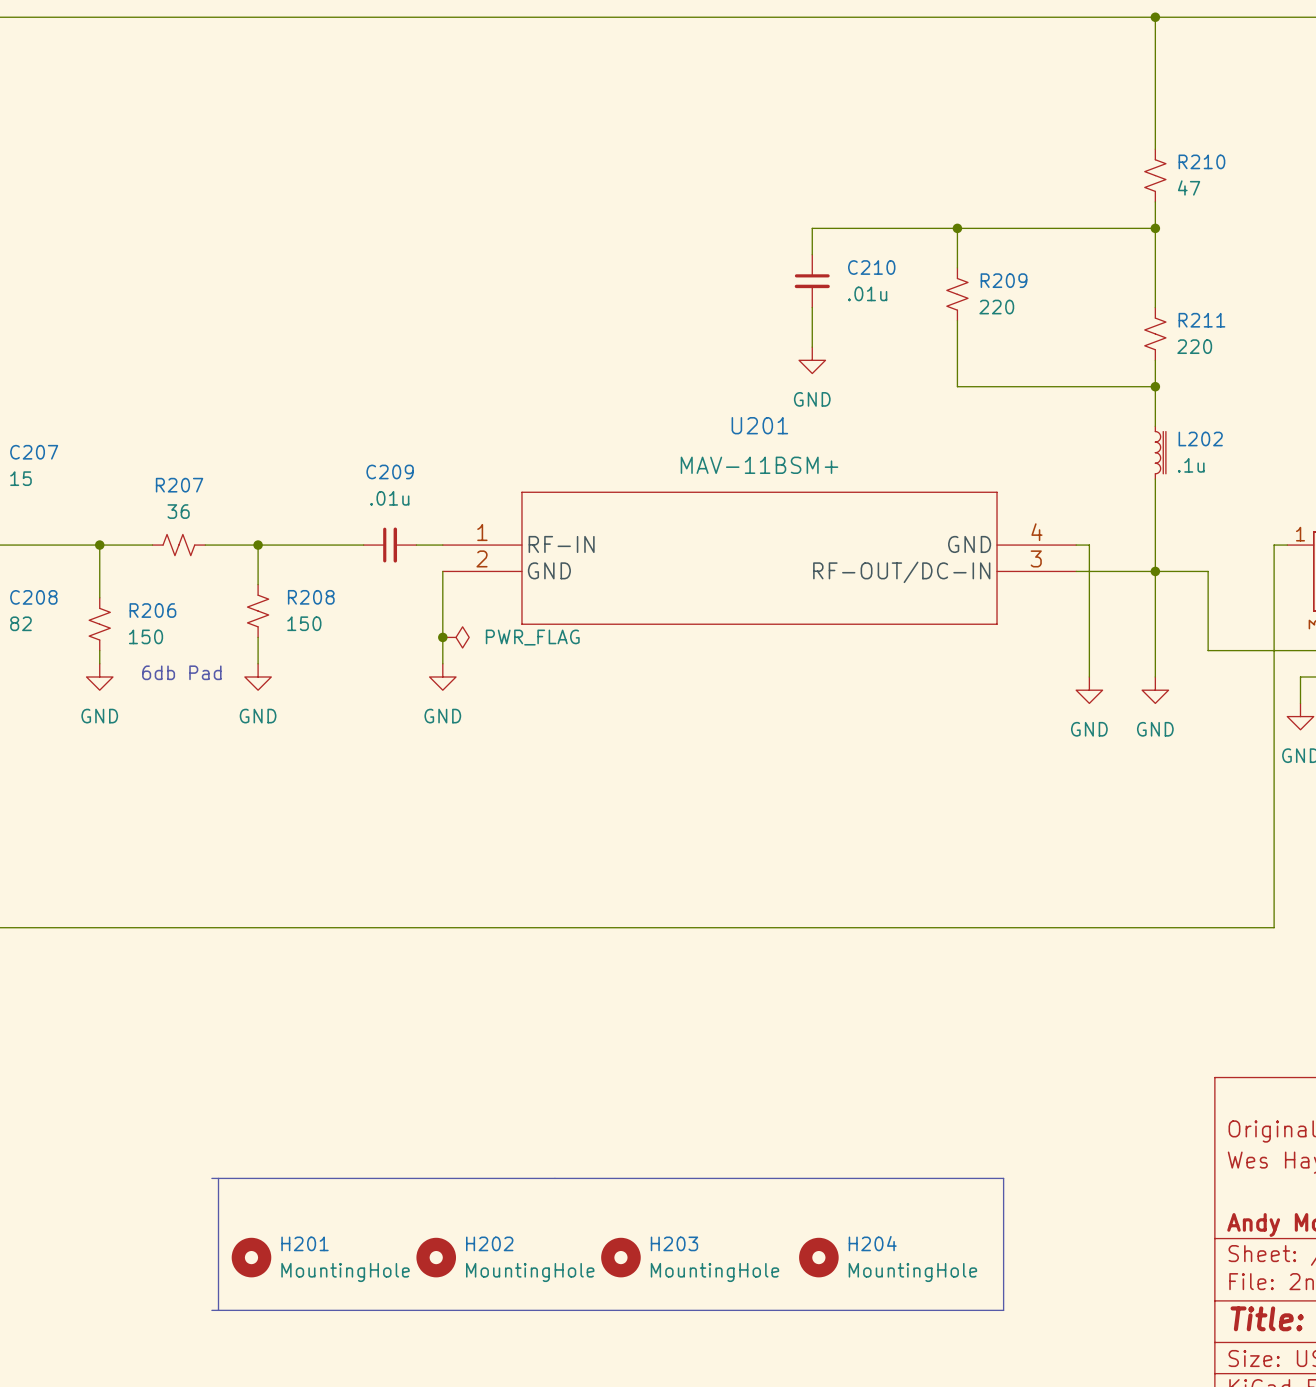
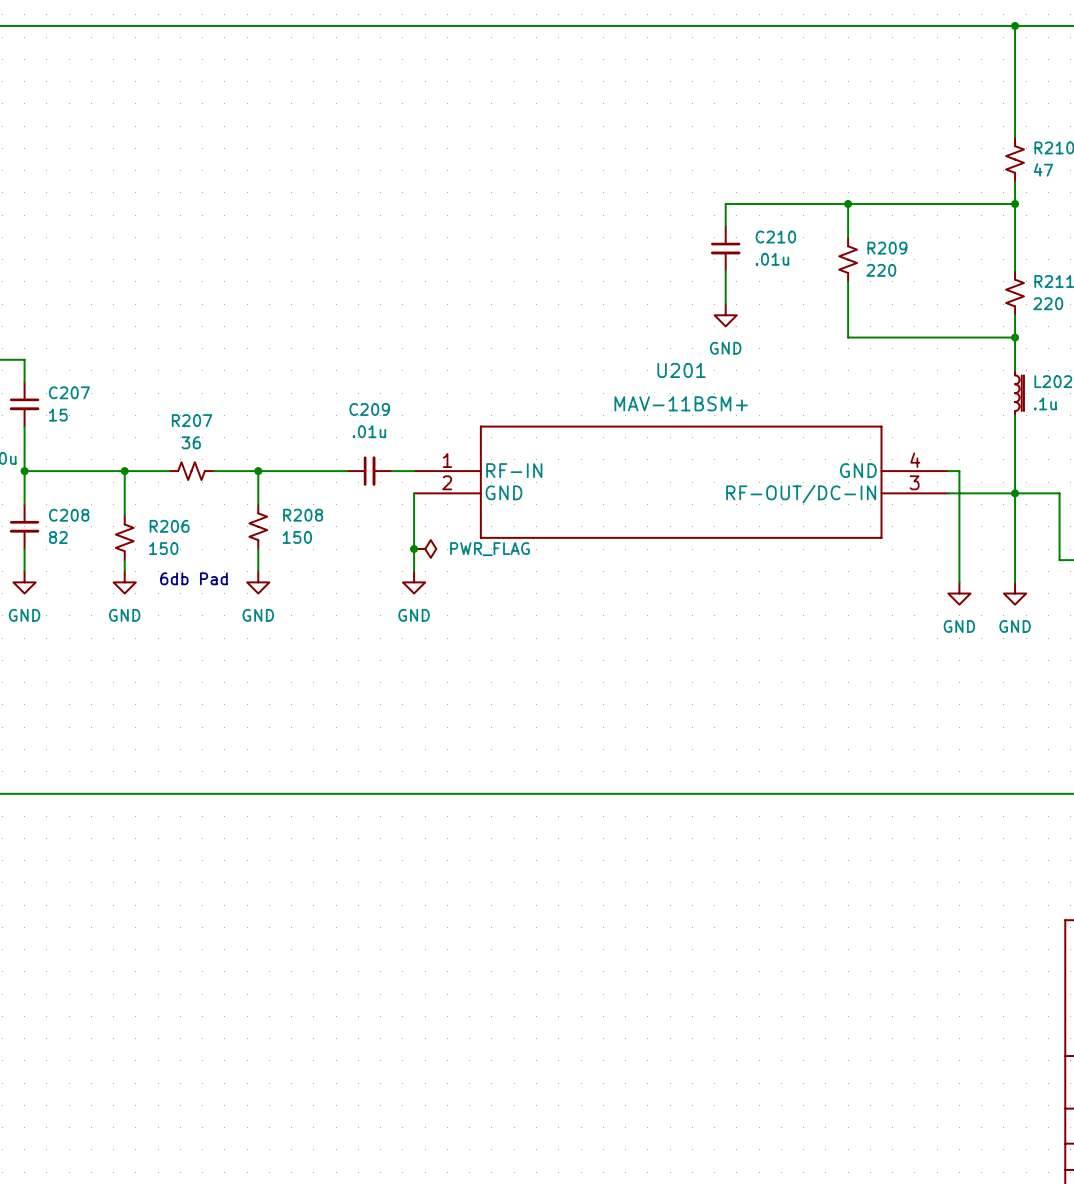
line: (211, 1178) (1003, 1178) (1003, 1310) (211, 1310) -> none
line: (218, 1178) (218, 1310) -> none
H201: MountingHole (251, 1257) -> none
H202: MountingHole (436, 1257) -> none
H203: MountingHole (620, 1257) -> none
H204: MountingHole (818, 1257) -> none

